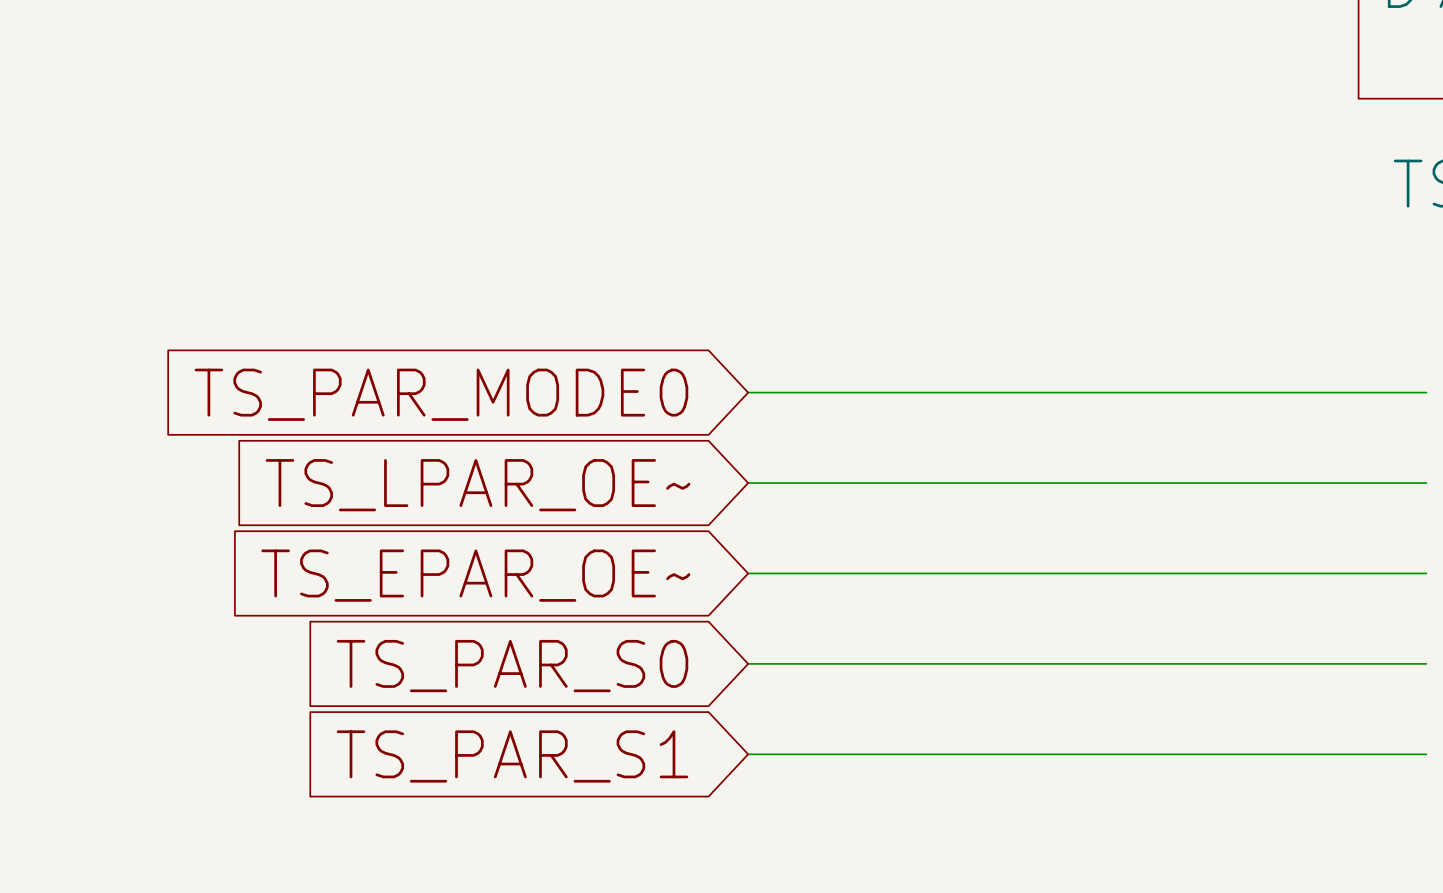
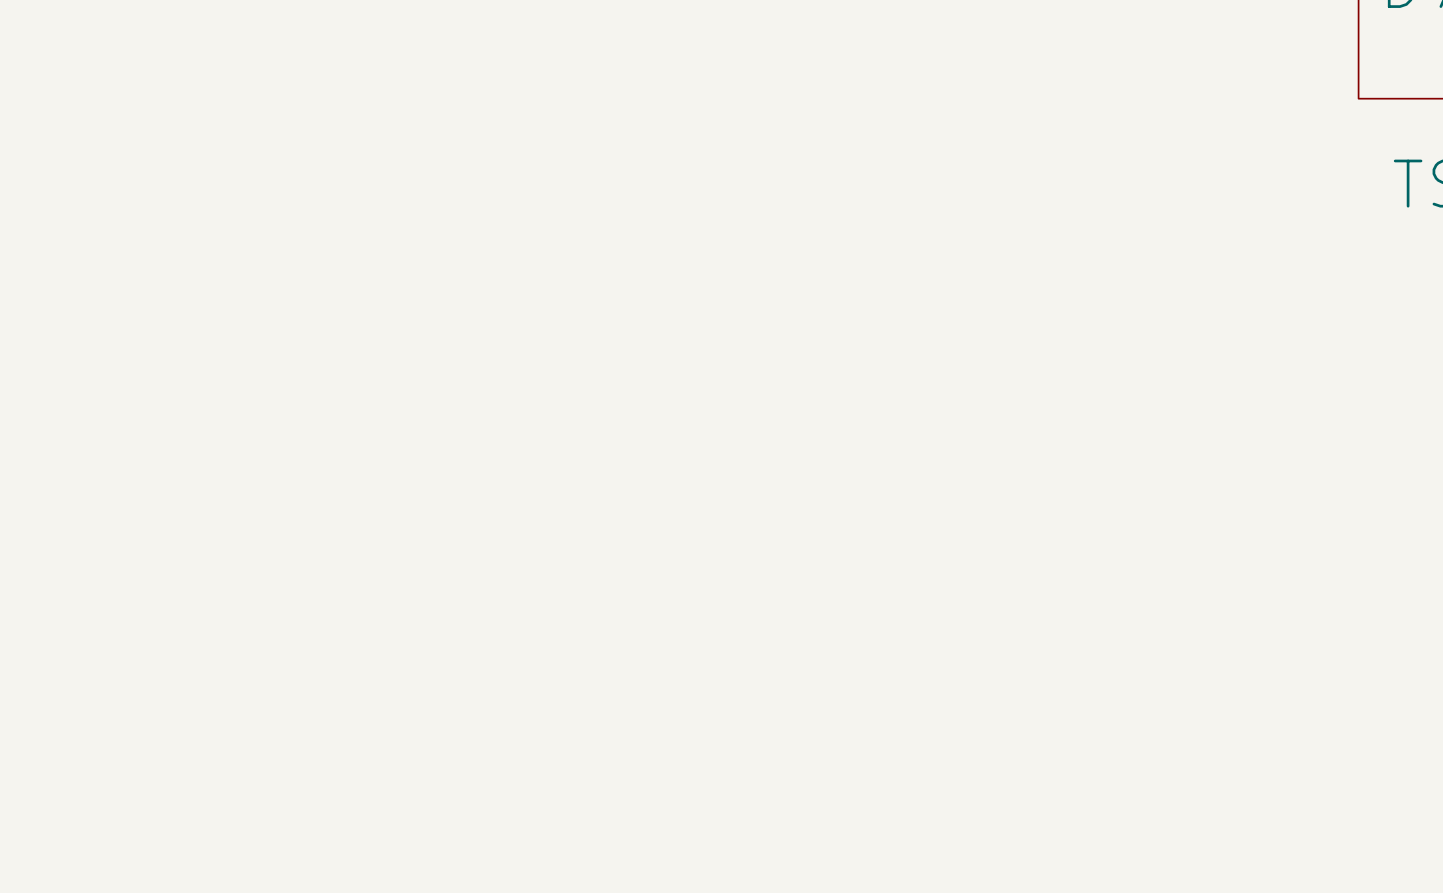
wire: (748, 392) (1426, 392) -> none
global label: TS_PAR_MODE0 (441, 394) -> none
wire: (748, 483) (1426, 483) -> none
global label: TS_LPAR_OE~ (478, 485) -> none
wire: (748, 573) (1426, 573) -> none
global label: TS_EPAR_OE~ (475, 575) -> none
wire: (748, 663) (1426, 663) -> none
global label: TS_PAR_S0 (512, 666) -> none
wire: (748, 754) (1426, 754) -> none
global label: TS_PAR_S1 (512, 756) -> none

